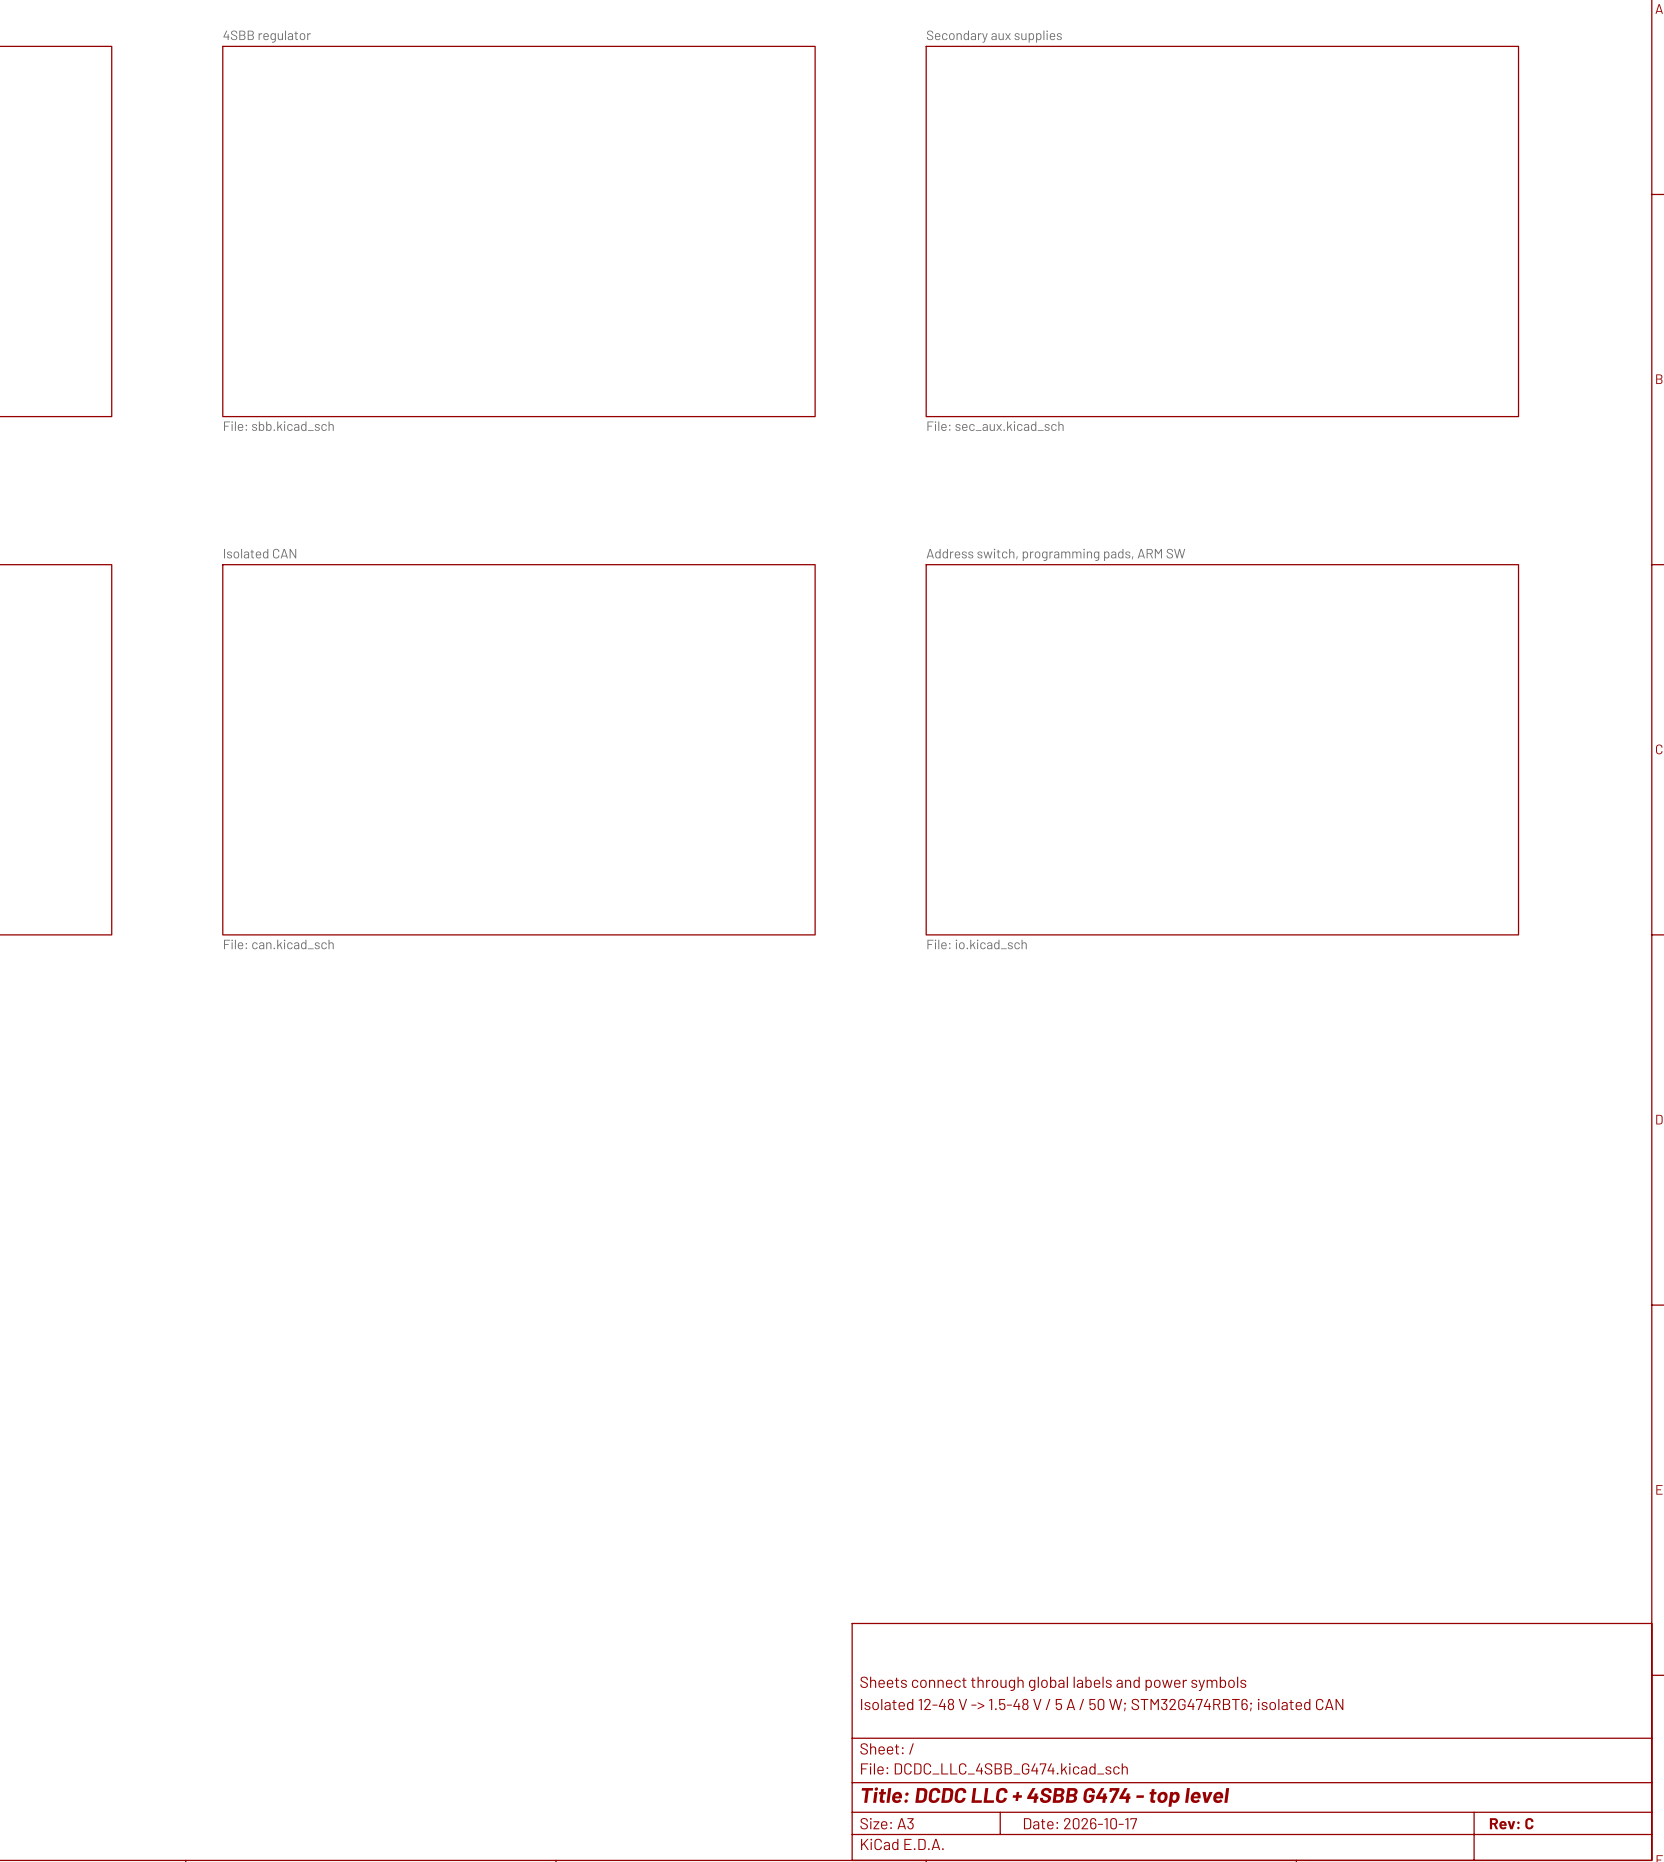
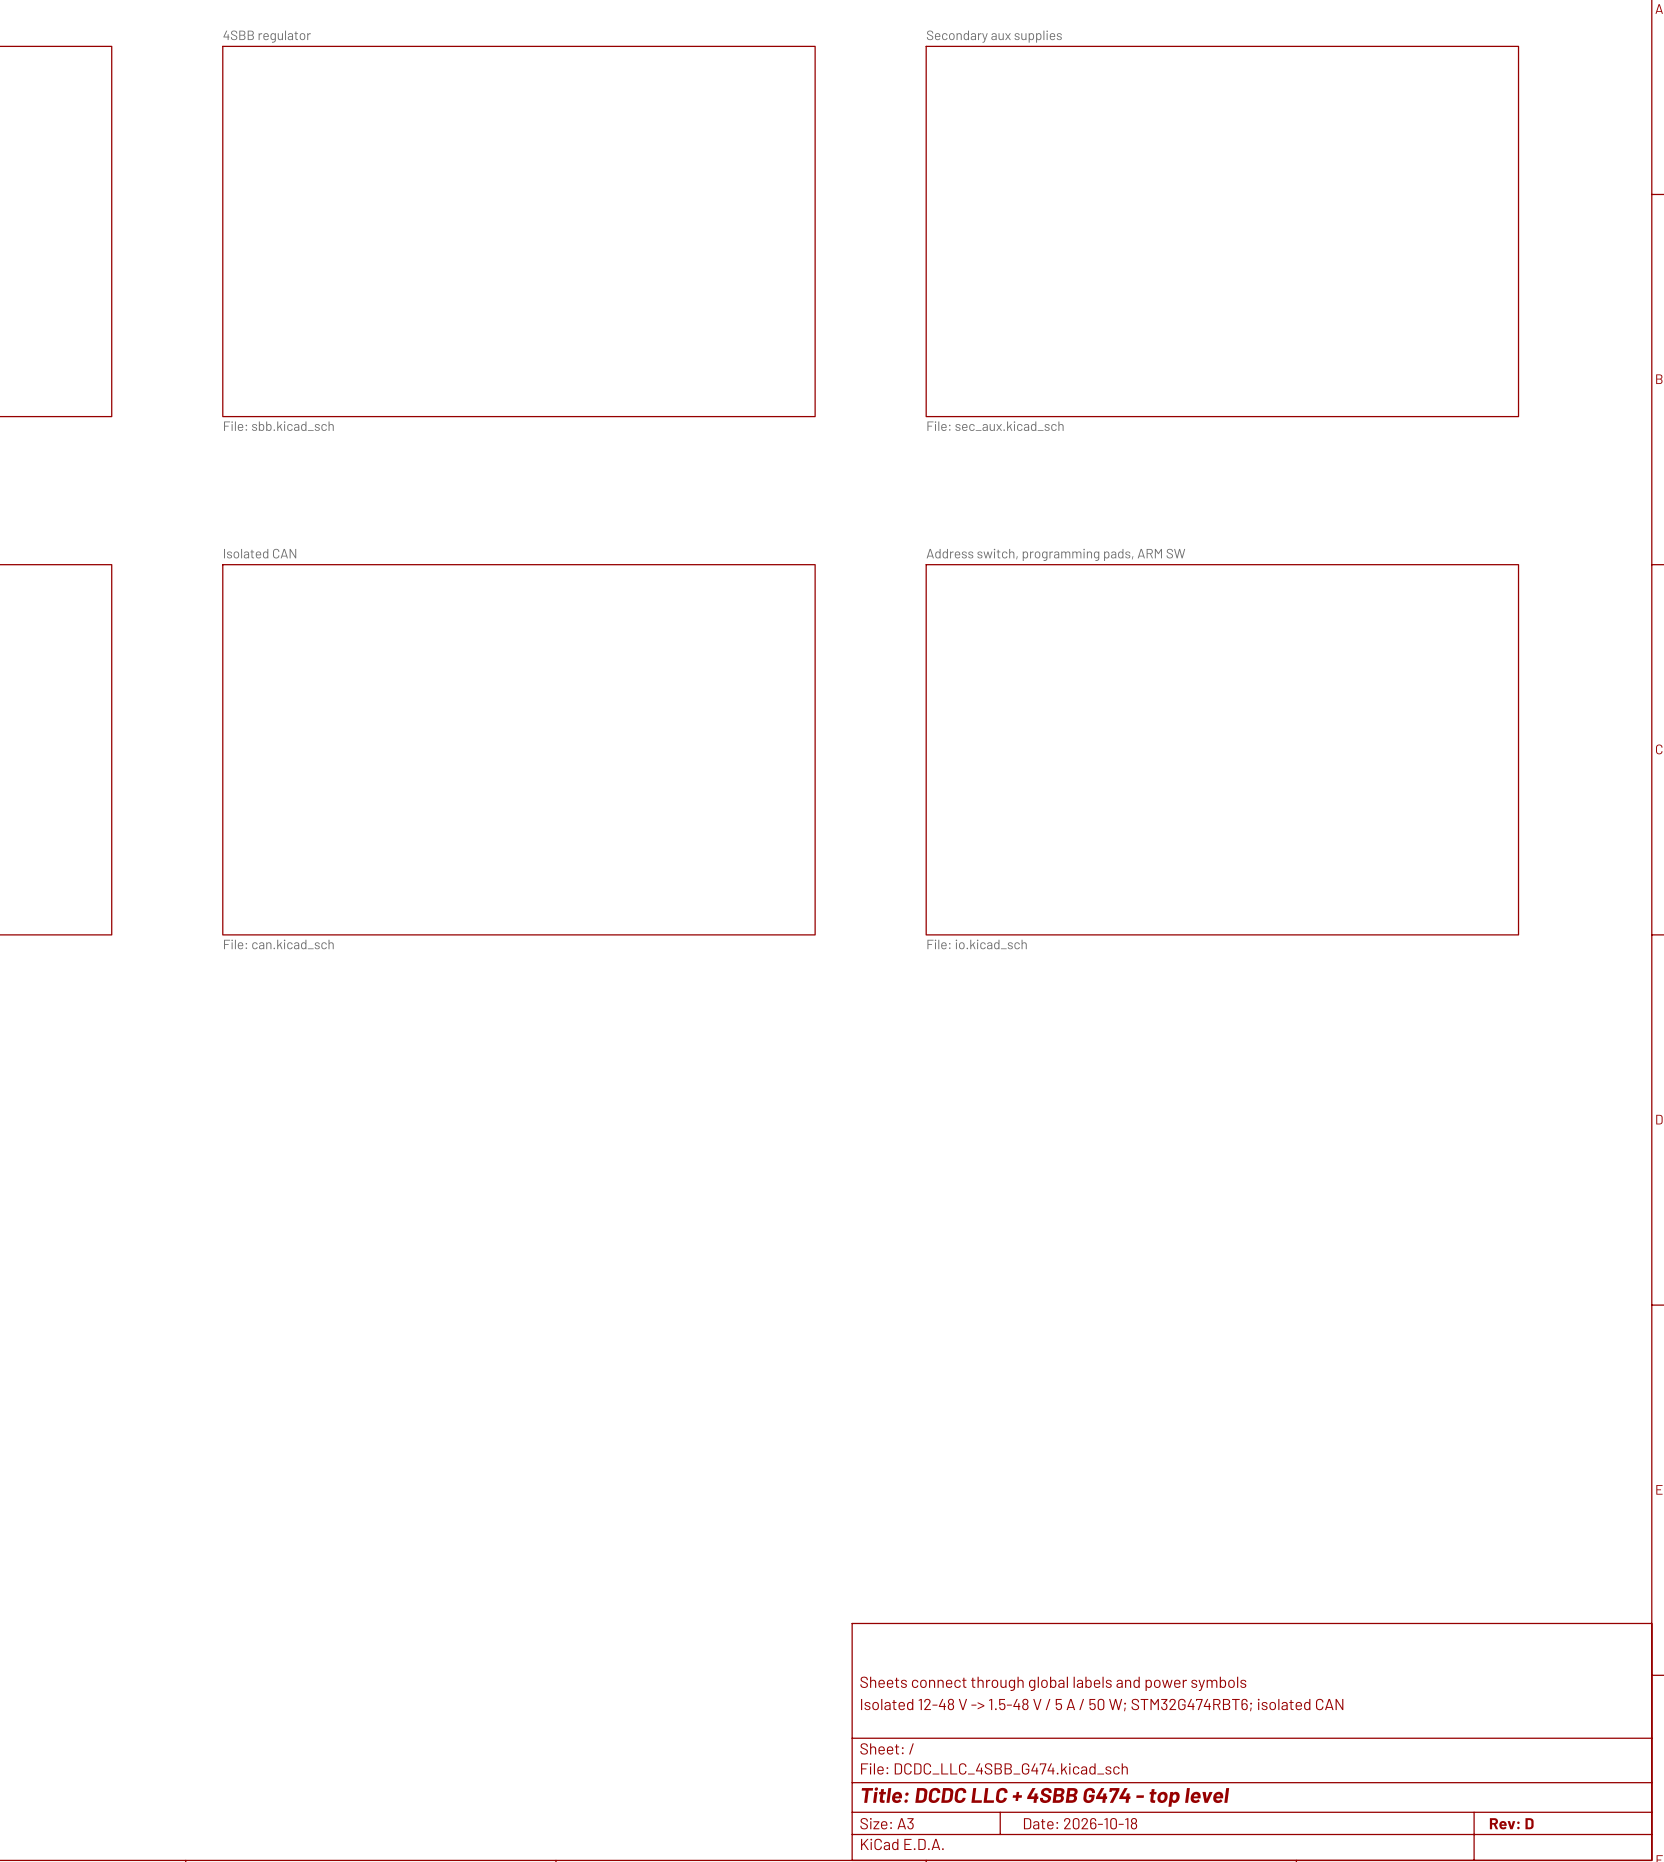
title block: Date: 2026-10-17 (1080, 1823) -> Date: 2026-10-18 (1080, 1823)
title block: Rev: C (1511, 1823) -> Rev: D (1511, 1823)

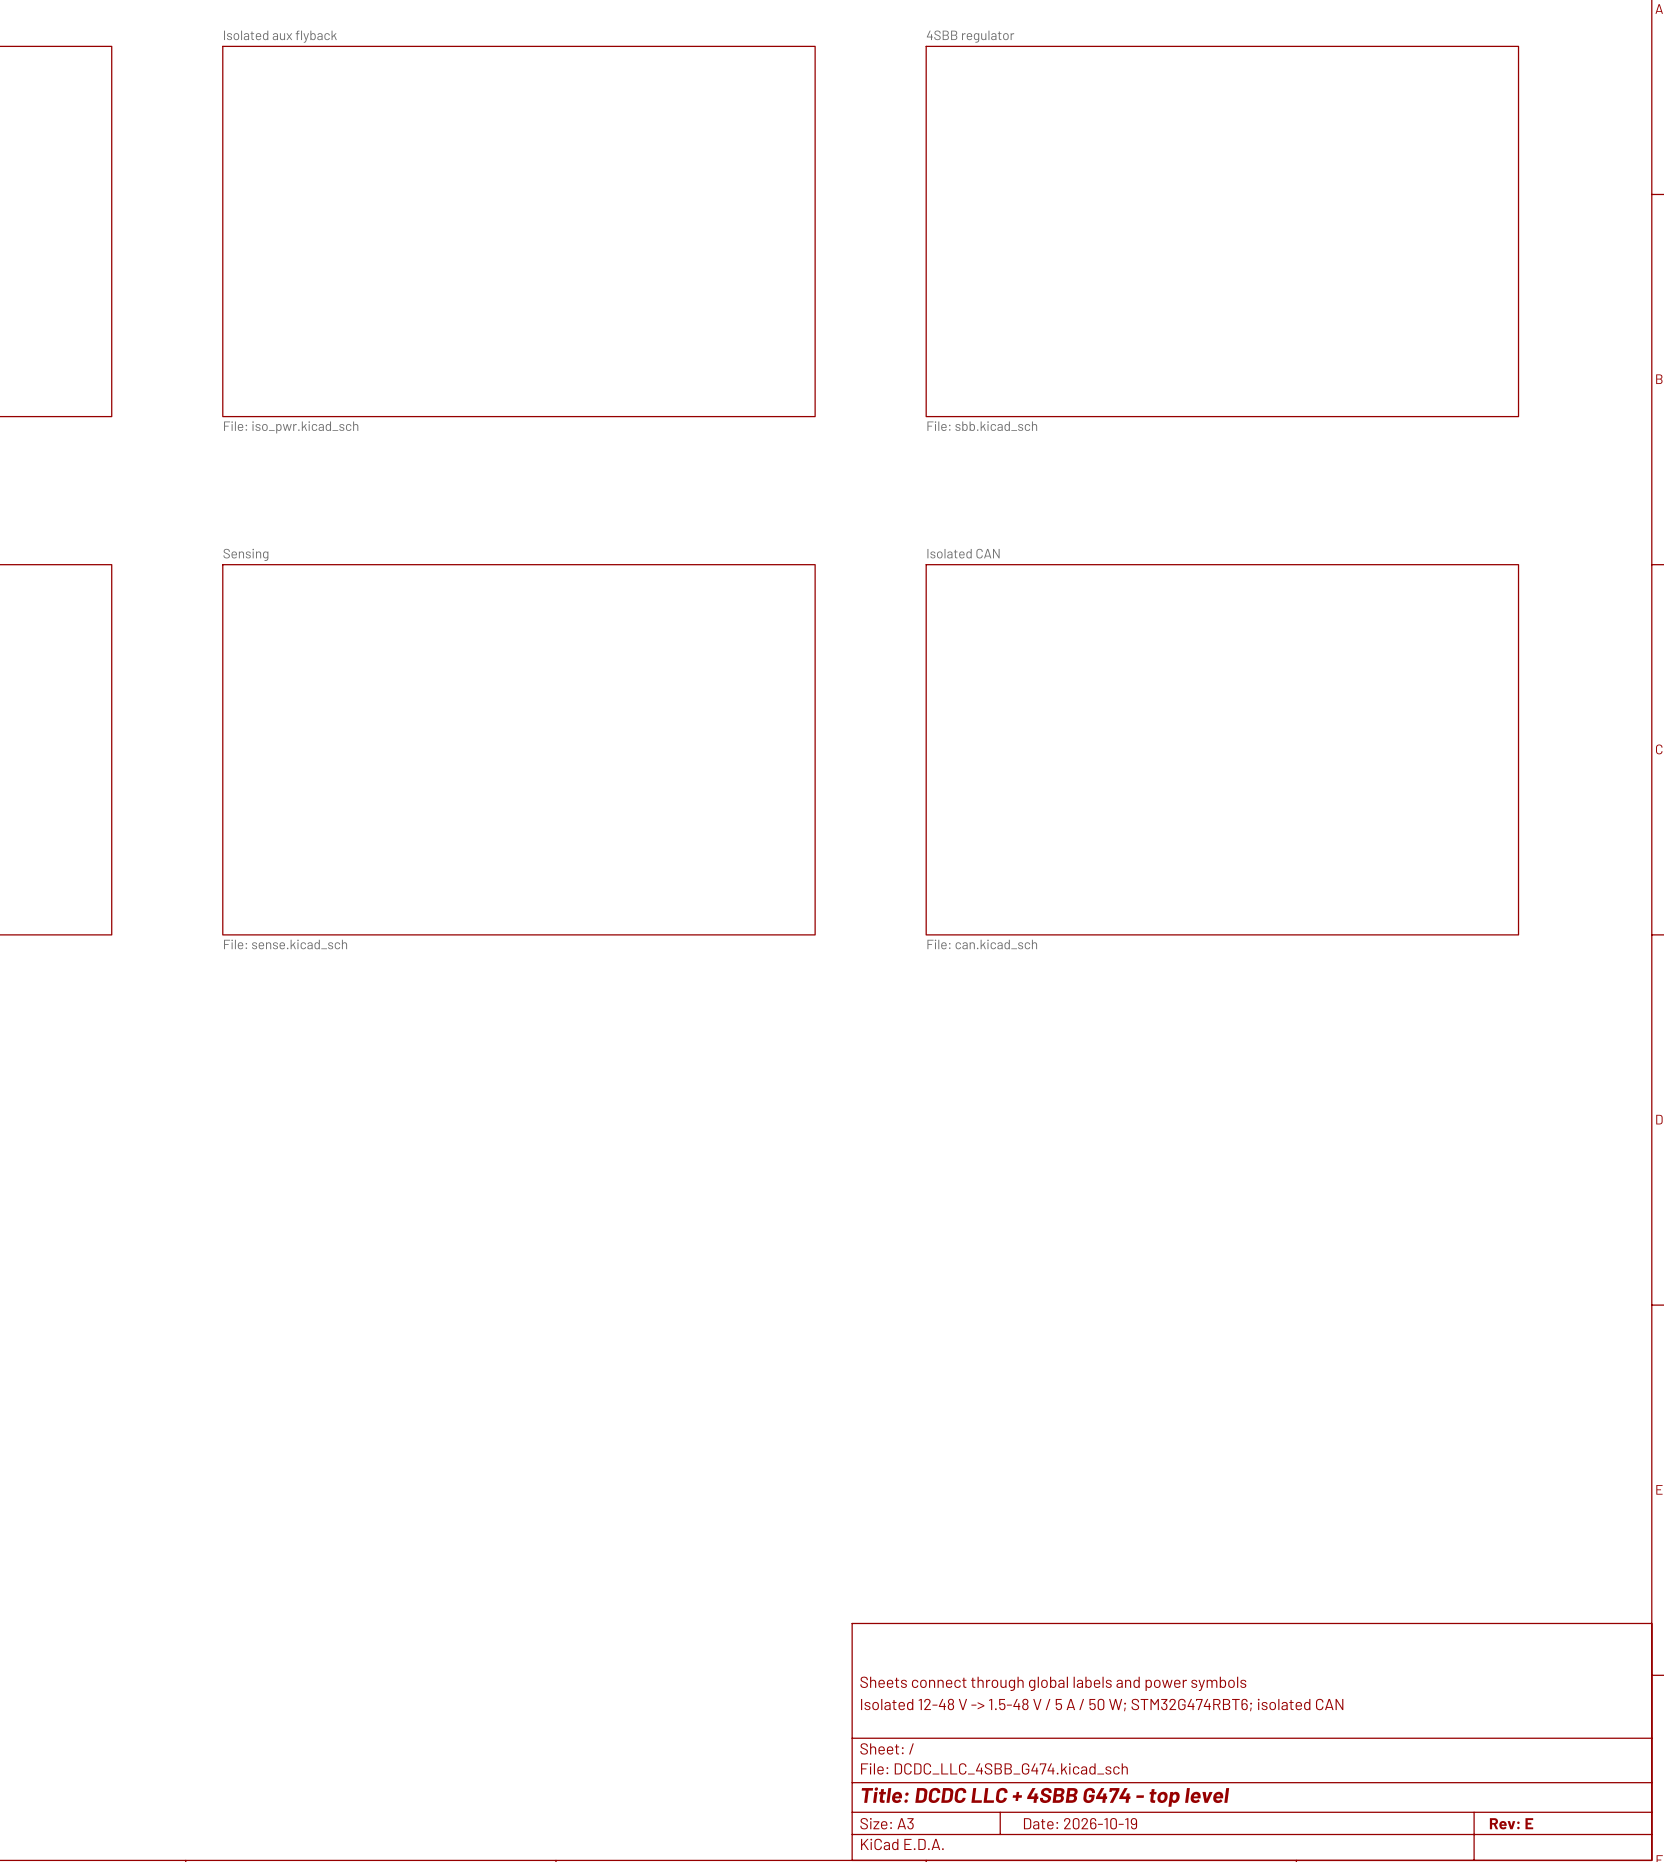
sheet 4SBB regulator name: 4SBB regulator (267, 36) -> Isolated aux flyback (280, 36)
sheet Secondary aux supplies name: Secondary aux supplies (994, 36) -> 4SBB regulator (970, 36)
sheet 4SBB regulator value: File: sbb.kicad_sch (278, 426) -> File: iso_pwr.kicad_sch (291, 427)
sheet Secondary aux supplies value: File: sec_aux.kicad_sch (995, 426) -> File: sbb.kicad_sch (982, 426)
sheet Isolated CAN name: Isolated CAN (260, 553) -> Sensing (245, 554)
sheet Isolated CAN name: Address switch, programming pads, ARM SW (1055, 554) -> Isolated CAN (963, 553)
sheet Isolated CAN value: File: can.kicad_sch (278, 944) -> File: sense.kicad_sch (285, 944)
sheet Isolated CAN value: File: io.kicad_sch (977, 944) -> File: can.kicad_sch (982, 944)
title block: Date: 2026-10-18 (1080, 1823) -> Date: 2026-10-19 (1080, 1823)
title block: Rev: D (1511, 1823) -> Rev: E (1511, 1823)

